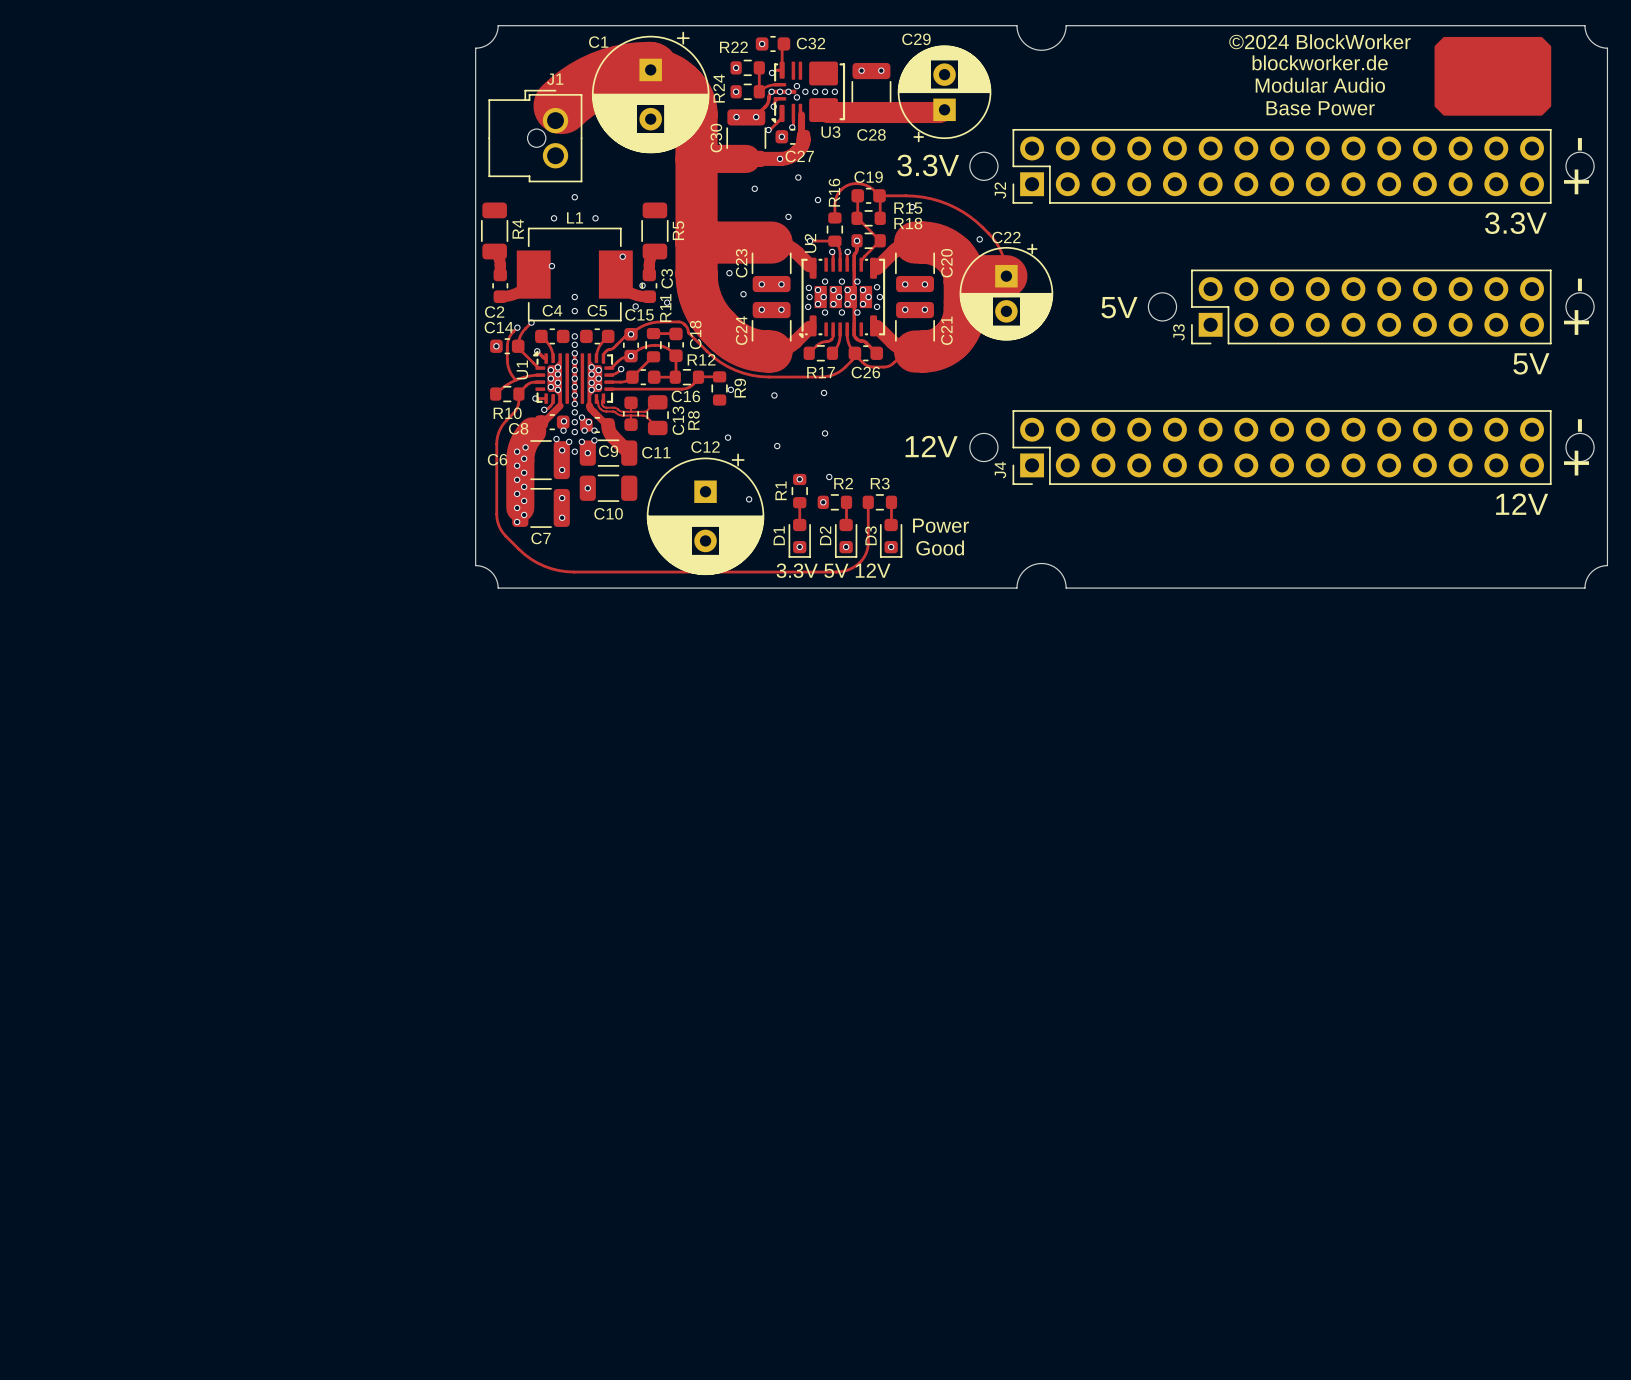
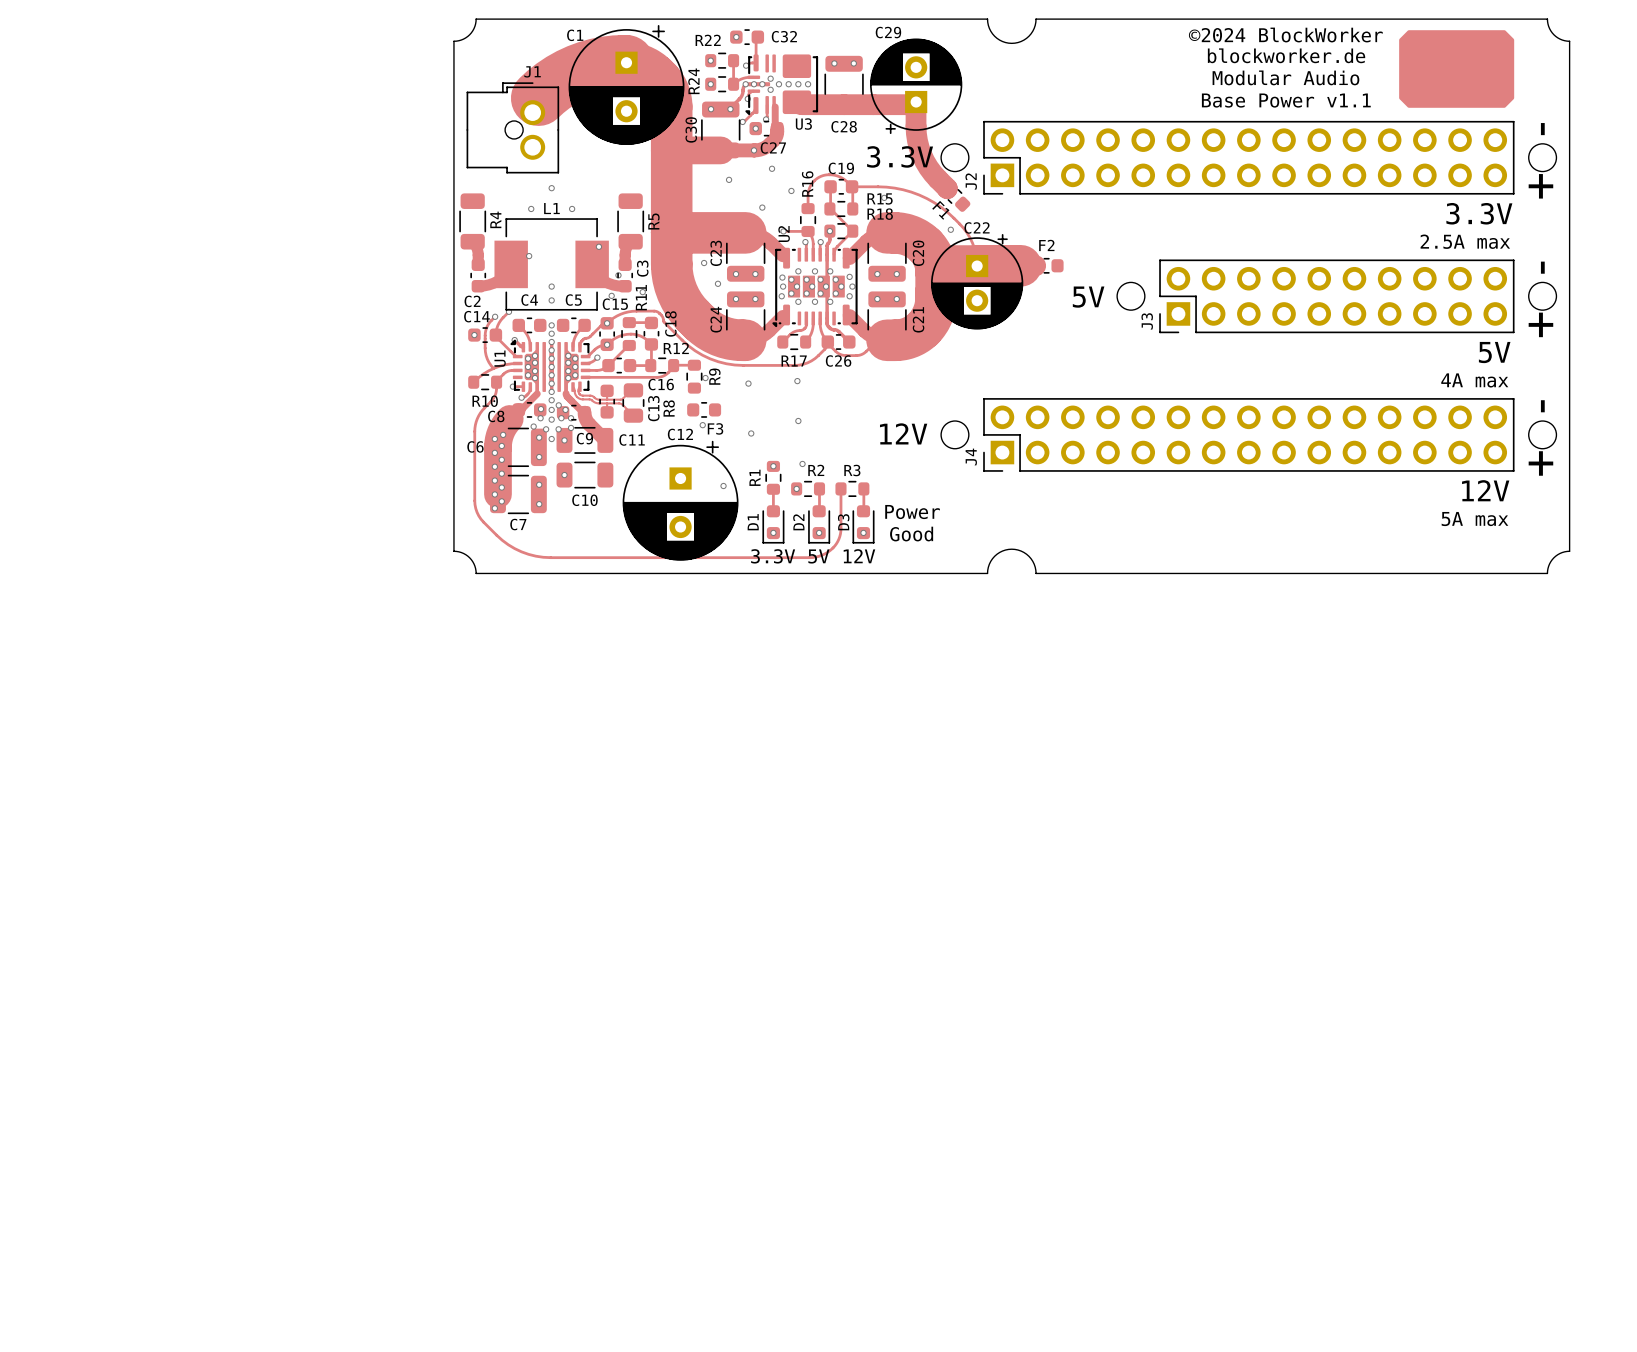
text: Base Power (1320, 108) -> Base Power v1.1 (1286, 100)
track: none -> (916, 102) (916, 133) (921, 154) (932, 173) (947, 188)
F1: none -> (954, 196)
text: none -> 2.5A max (1465, 241)
track: none -> (1035, 265) (977, 266)
F2: none -> (1046, 265)
text: none -> 4A max (1474, 380)
F3: none -> (704, 409)
text: none -> 5A max (1474, 519)

